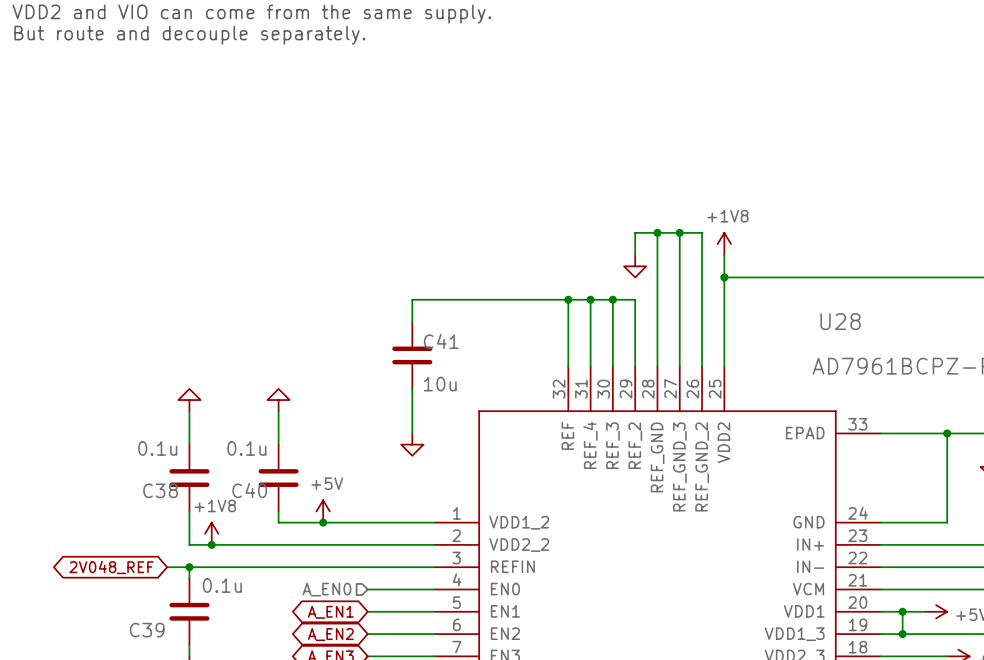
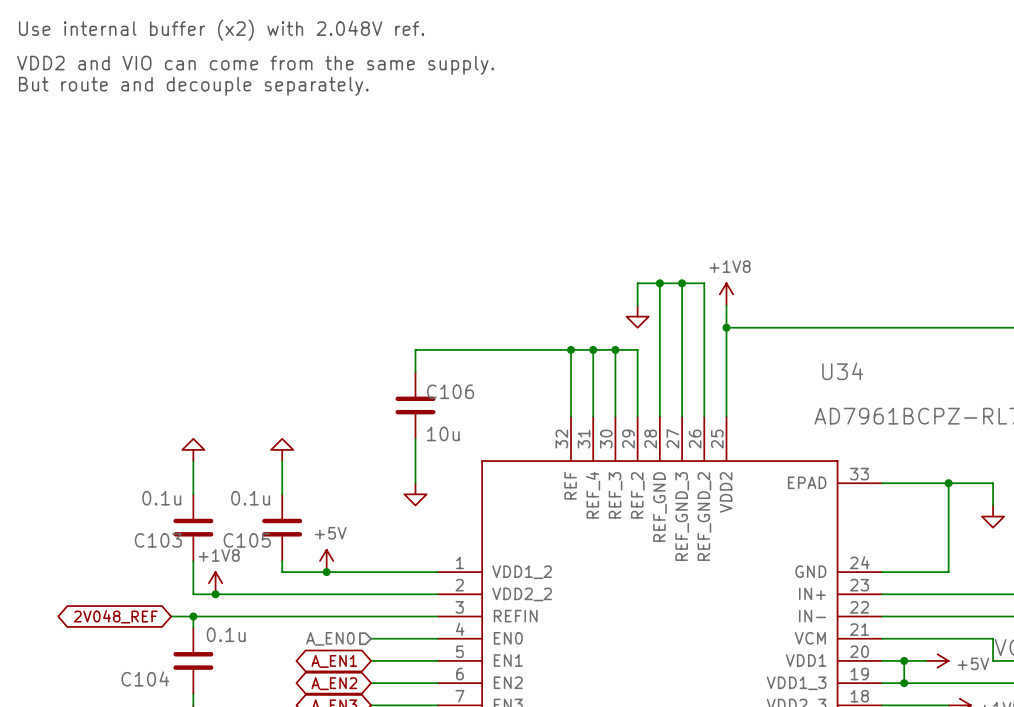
U28 name: U28 (840, 321) -> U34 (842, 371)
C41 name: C41 (441, 341) -> C106 (450, 391)
C38 name: C38 (160, 490) -> C103 (158, 540)
C40 name: C40 (249, 490) -> C105 (247, 540)
C39 name: C39 (147, 630) -> C104 (145, 678)

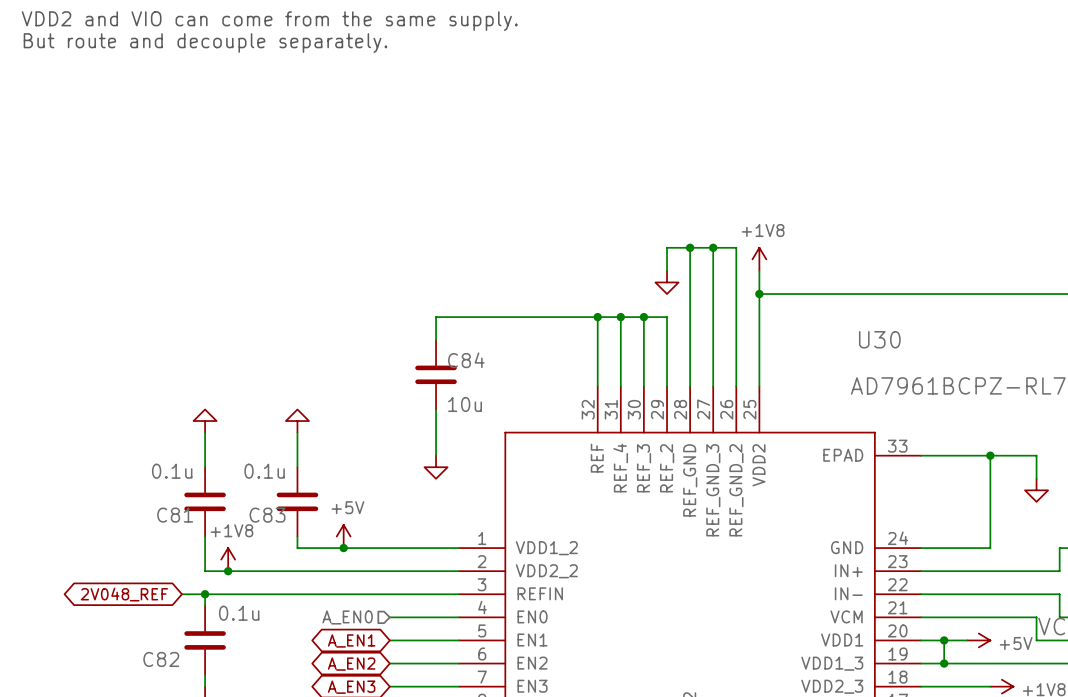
U34 name: U34 (842, 371) -> U30 (879, 339)
C106 name: C106 (450, 391) -> C84 (466, 360)
C103 name: C103 (158, 540) -> C81 (175, 515)
C105 name: C105 (247, 540) -> C83 (267, 515)
C104 name: C104 (145, 678) -> C82 (161, 659)

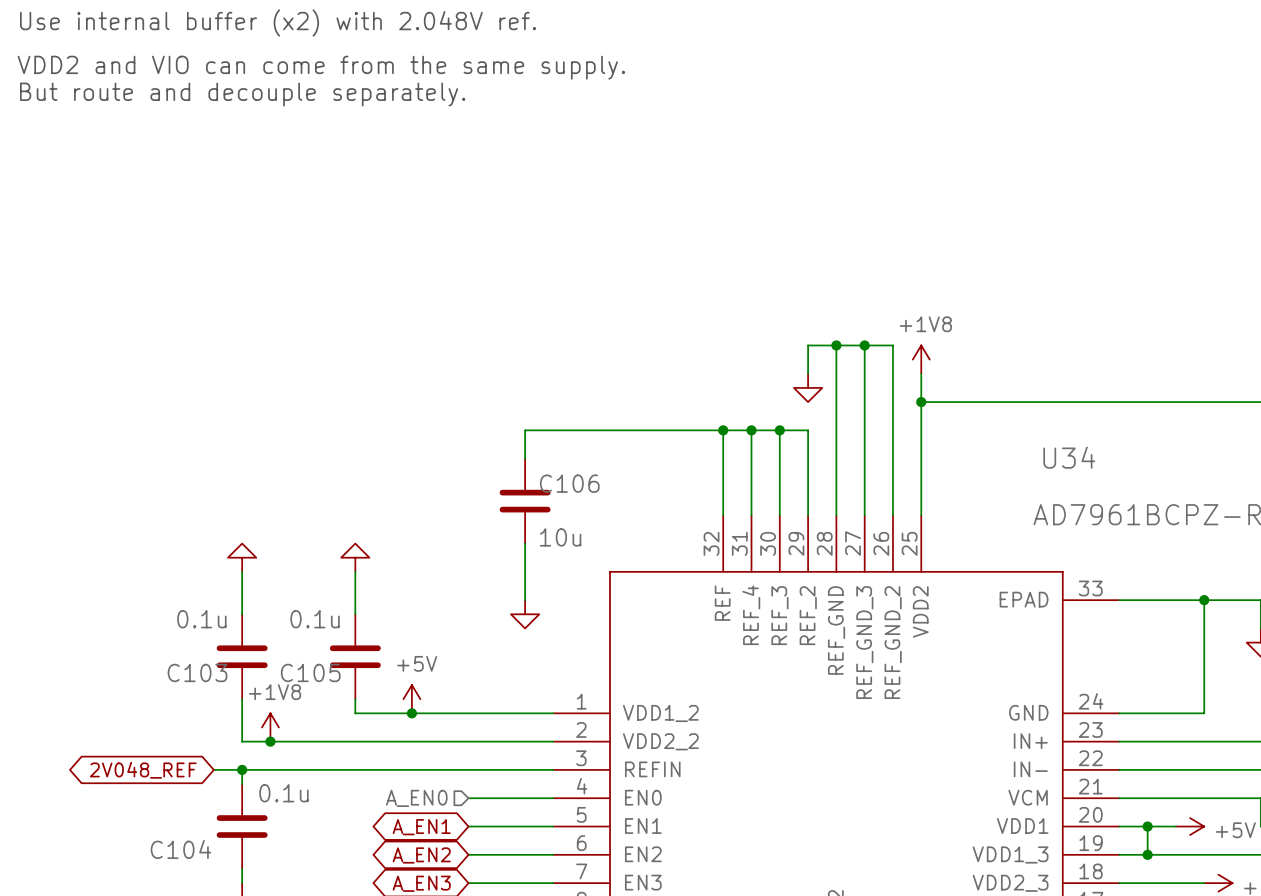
U30 name: U30 (879, 339) -> U34 (1069, 457)
C84 name: C84 (466, 360) -> C106 (569, 483)
C81 name: C81 (175, 515) -> C103 (197, 672)
C83 name: C83 (267, 515) -> C105 (310, 672)
C82 name: C82 (161, 659) -> C104 (180, 849)

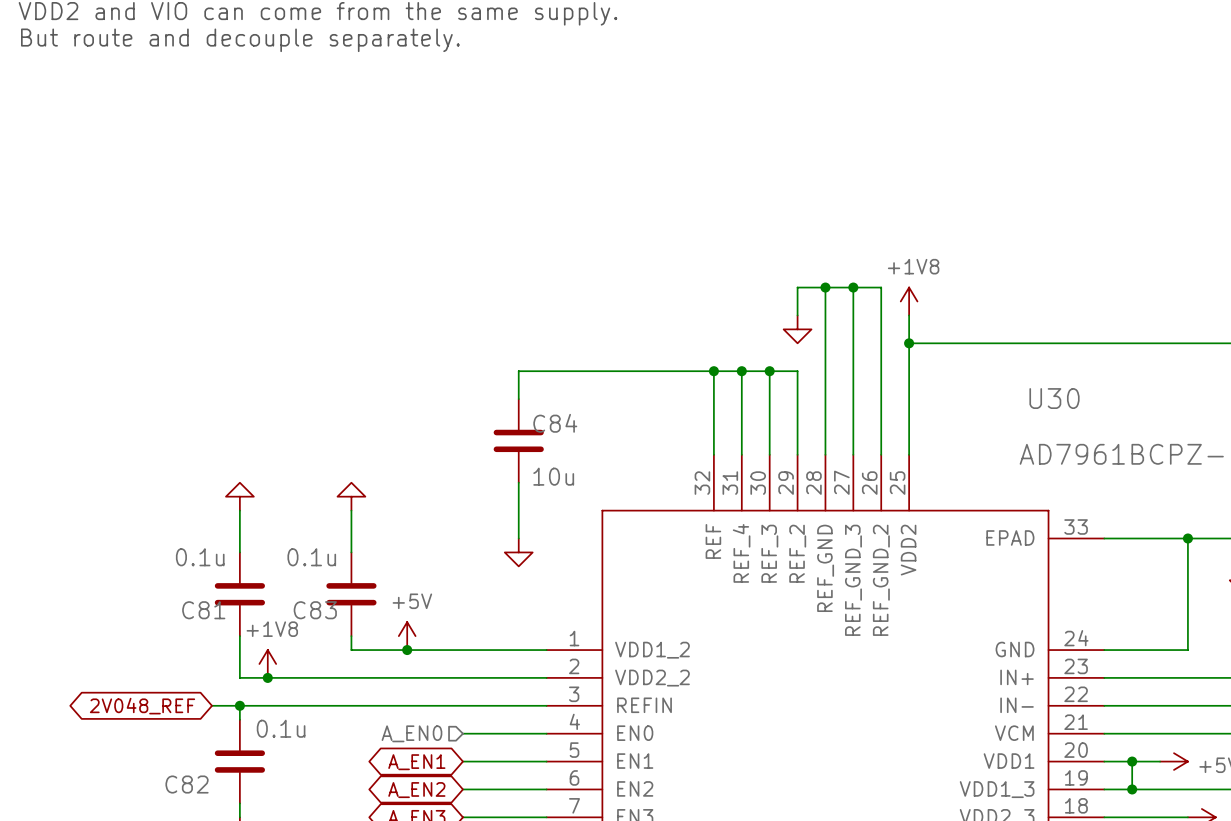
U34 name: U34 (1069, 457) -> U30 (1054, 398)
C106 name: C106 (569, 483) -> C84 (555, 423)
C103 name: C103 (197, 672) -> C81 (203, 610)
C105 name: C105 (310, 672) -> C83 (315, 610)
C104 name: C104 (180, 849) -> C82 (187, 784)

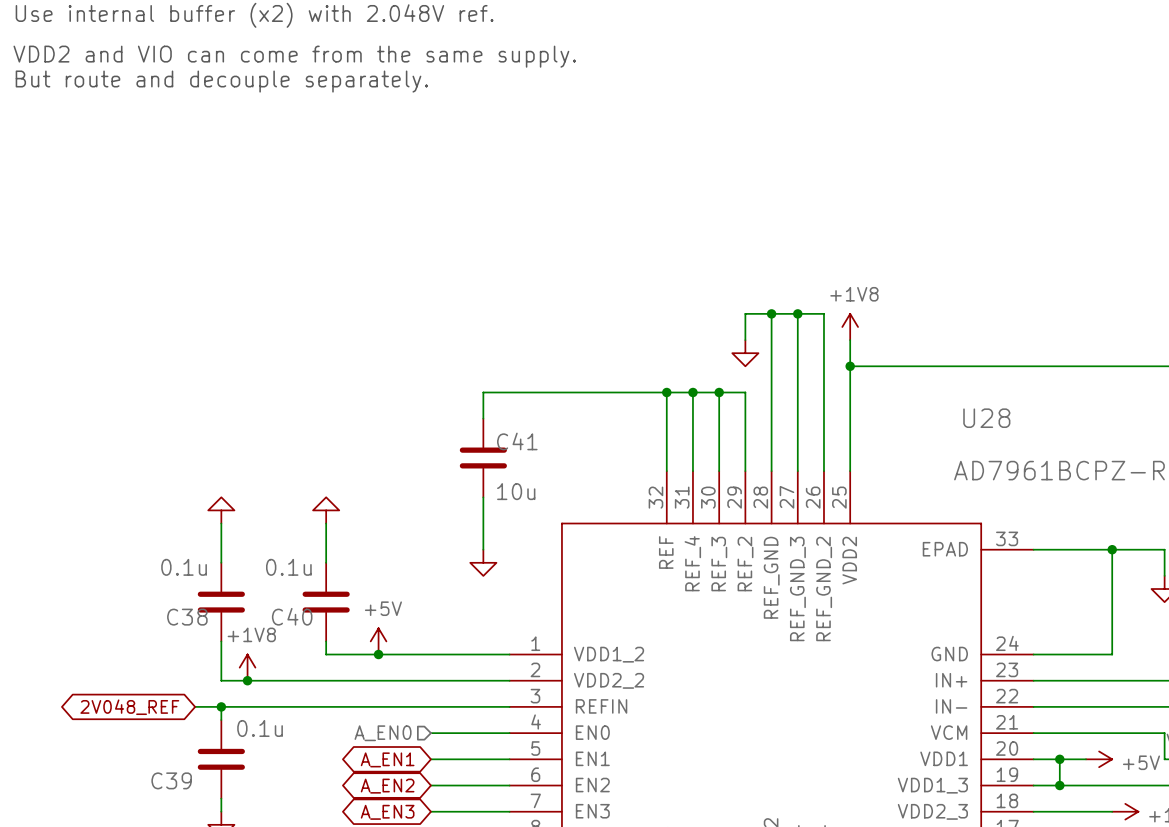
U30 name: U30 (1054, 398) -> U28 (986, 418)
C84 name: C84 (555, 423) -> C41 (517, 441)
C81 name: C81 (203, 610) -> C38 (187, 617)
C83 name: C83 (315, 610) -> C40 (292, 616)
C82 name: C82 (187, 784) -> C39 (171, 780)

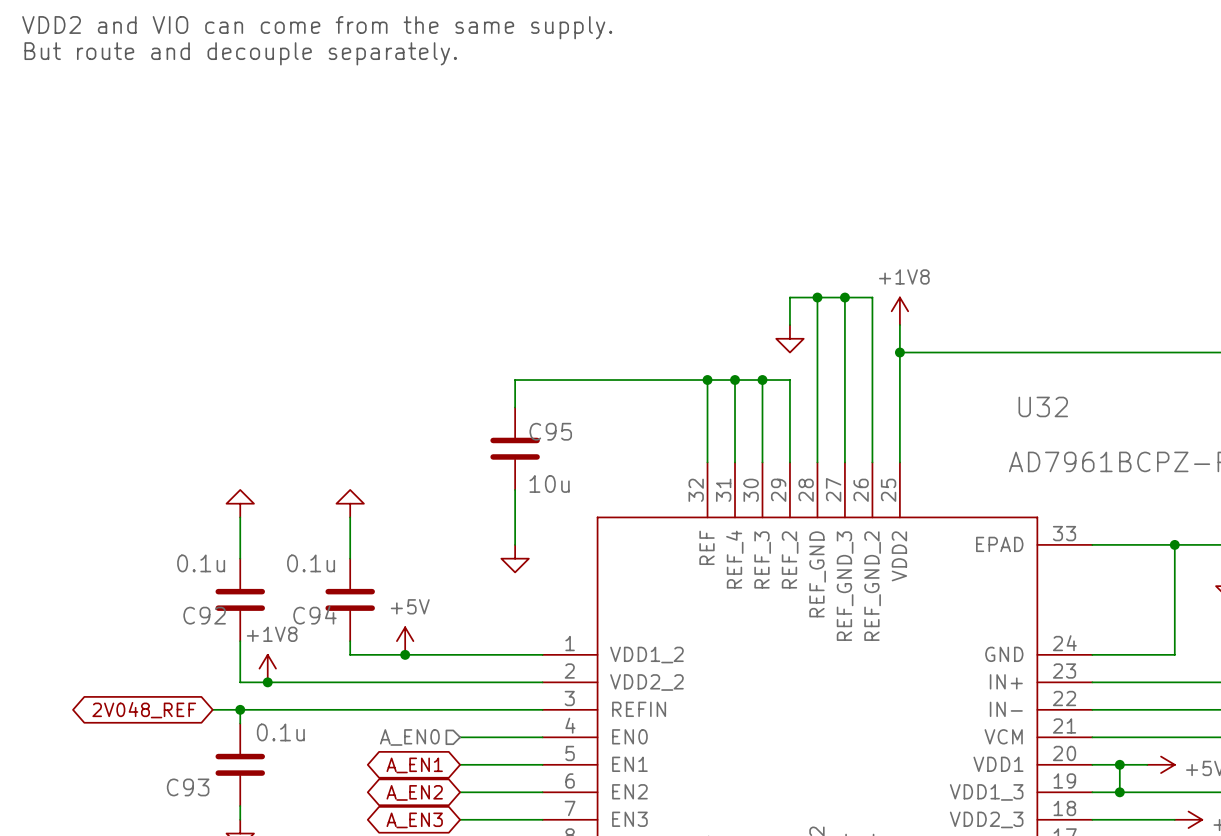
U28 name: U28 (986, 418) -> U32 (1043, 406)
C41 name: C41 (517, 441) -> C95 (550, 431)
C40 name: C40 (292, 616) -> C94 (314, 615)
C38 name: C38 (187, 617) -> C92 (204, 615)
C39 name: C39 (171, 780) -> C93 (188, 787)

